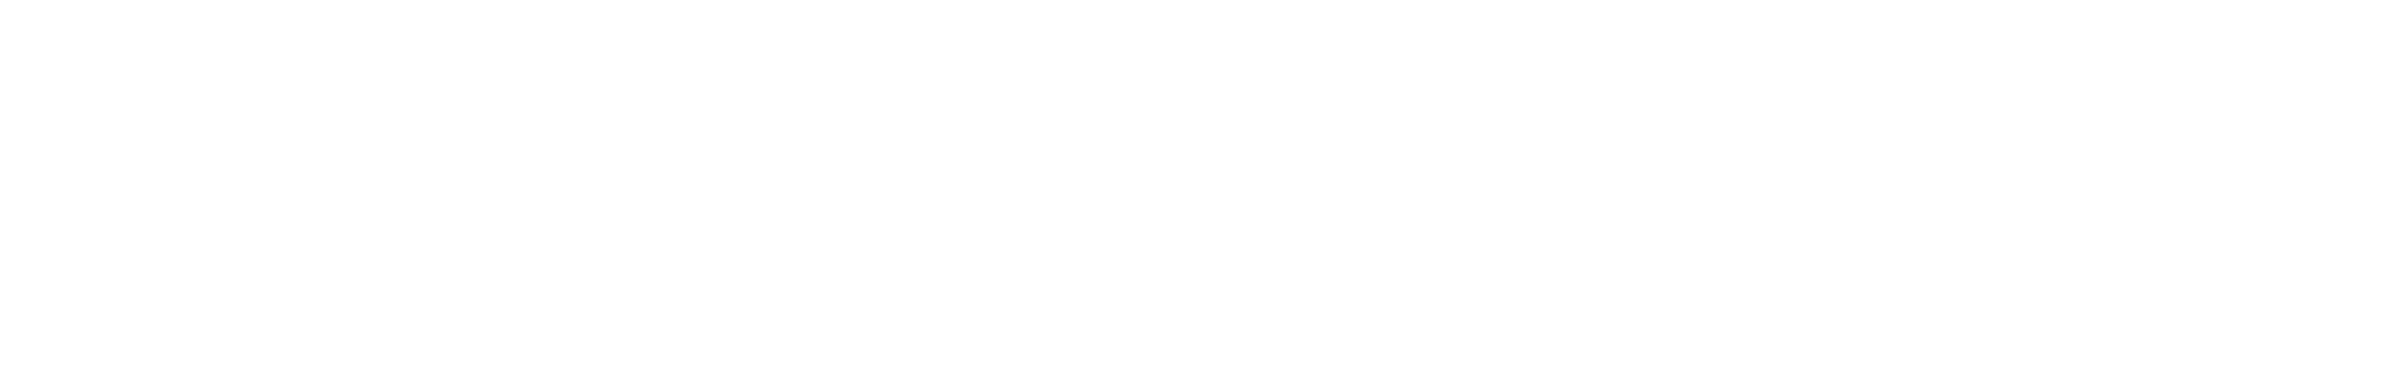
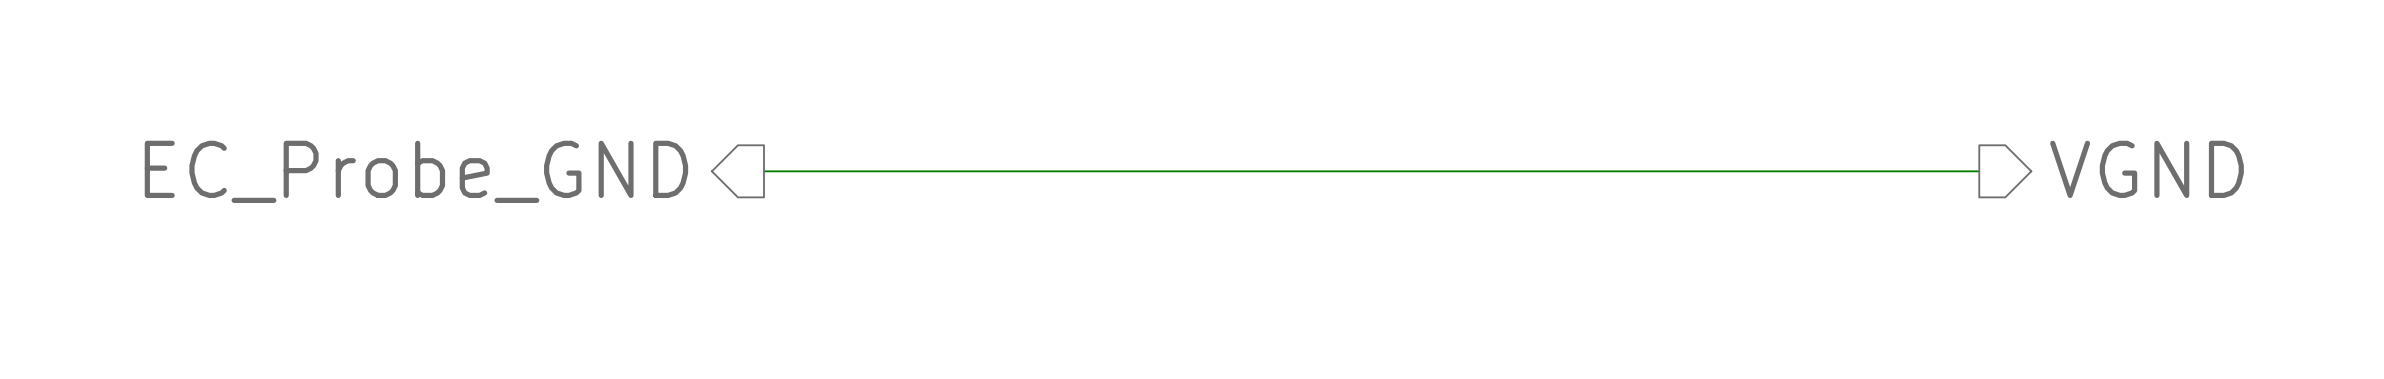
hierarchical label: none -> VGND (2147, 169)
wire: none -> (763, 171) (1979, 171)
hierarchical label: none -> EC_Probe_GND (416, 171)

